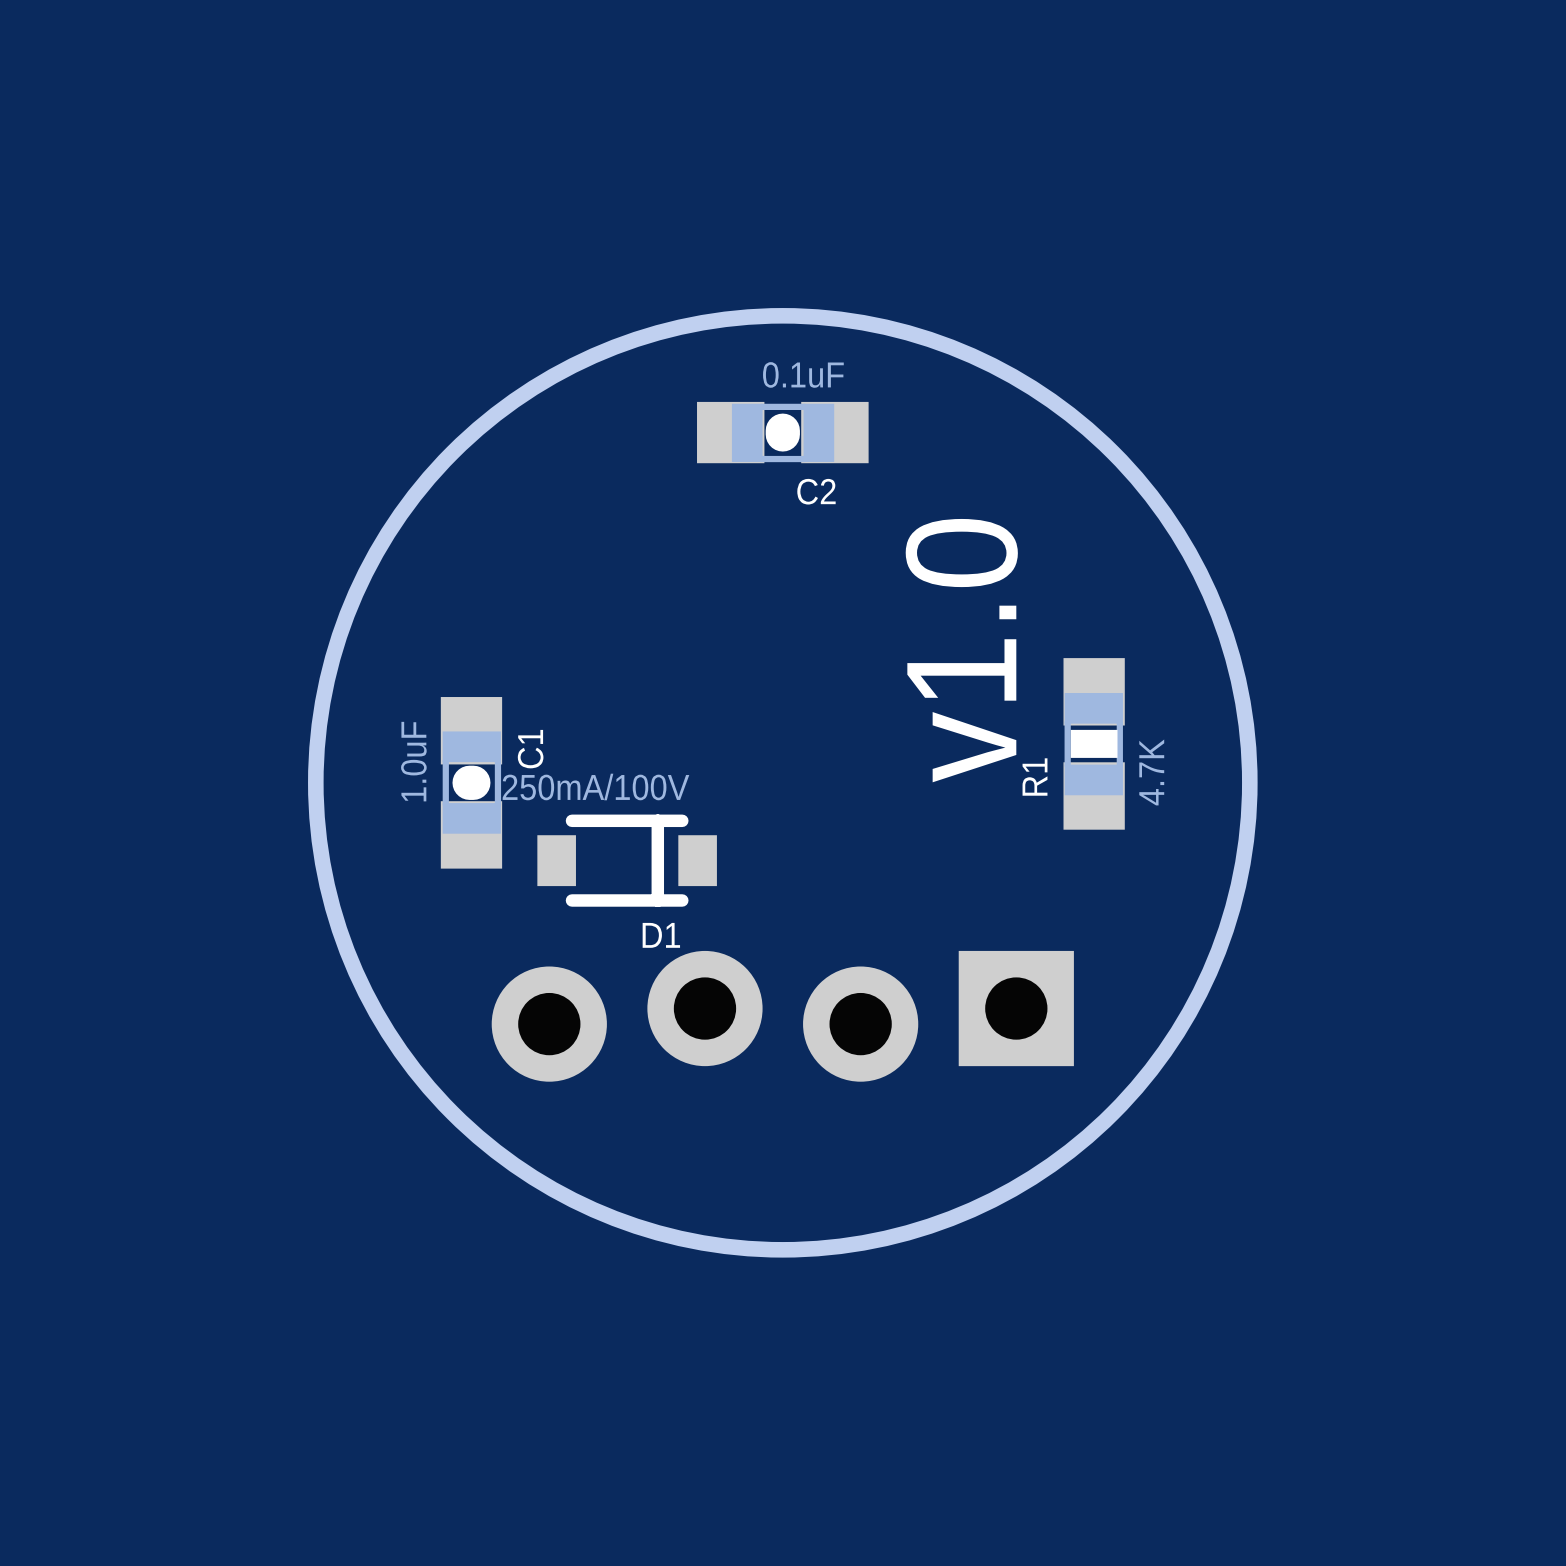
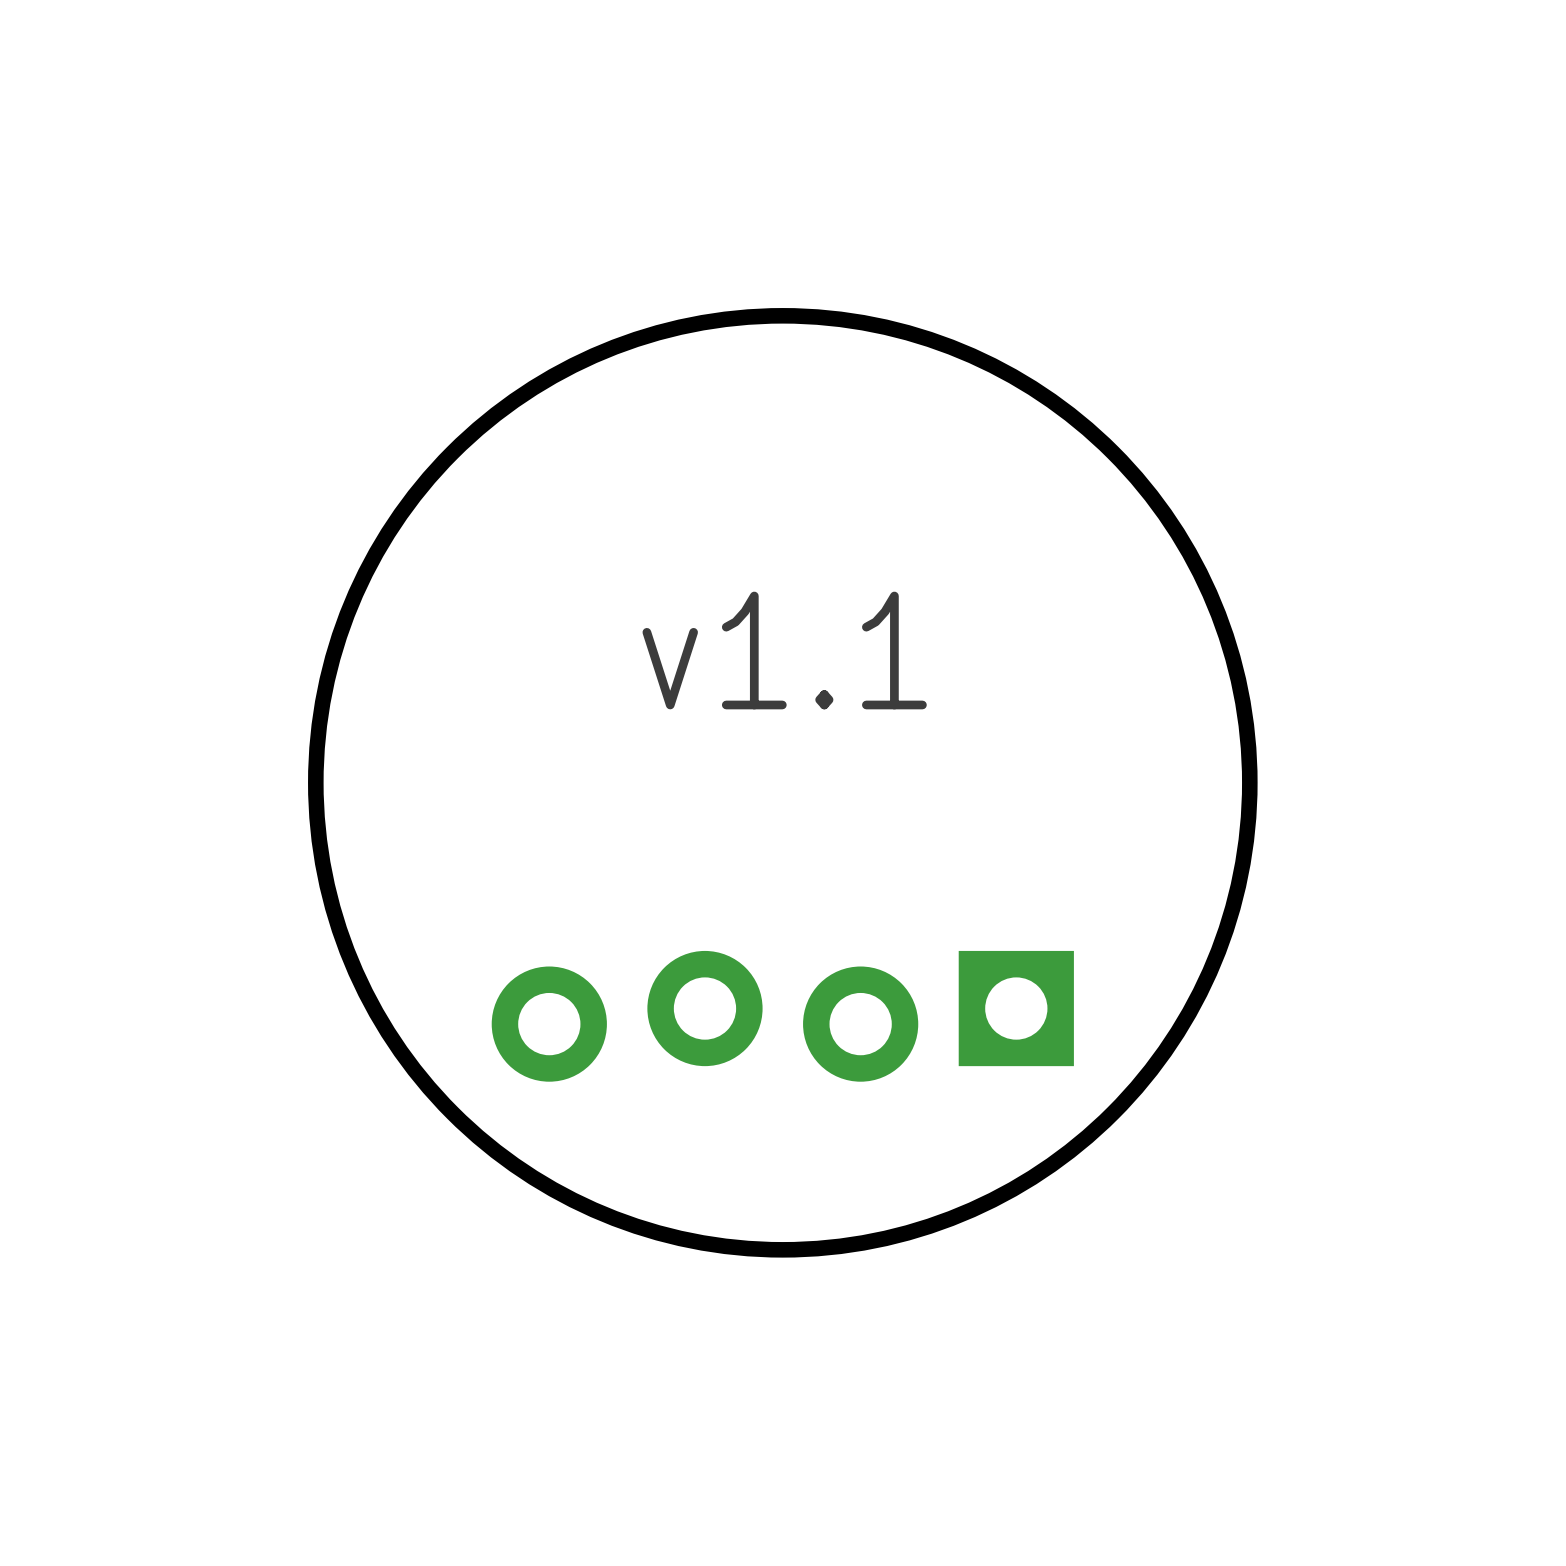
C2: 0.1uF (782, 432) -> none
text: v1.0 (961, 650) -> v1.1 (784, 650)
R1: 4.7K (1094, 743) -> none
C1: 1.0uF (471, 782) -> none
D1: 250mA/100V (627, 860) -> none

